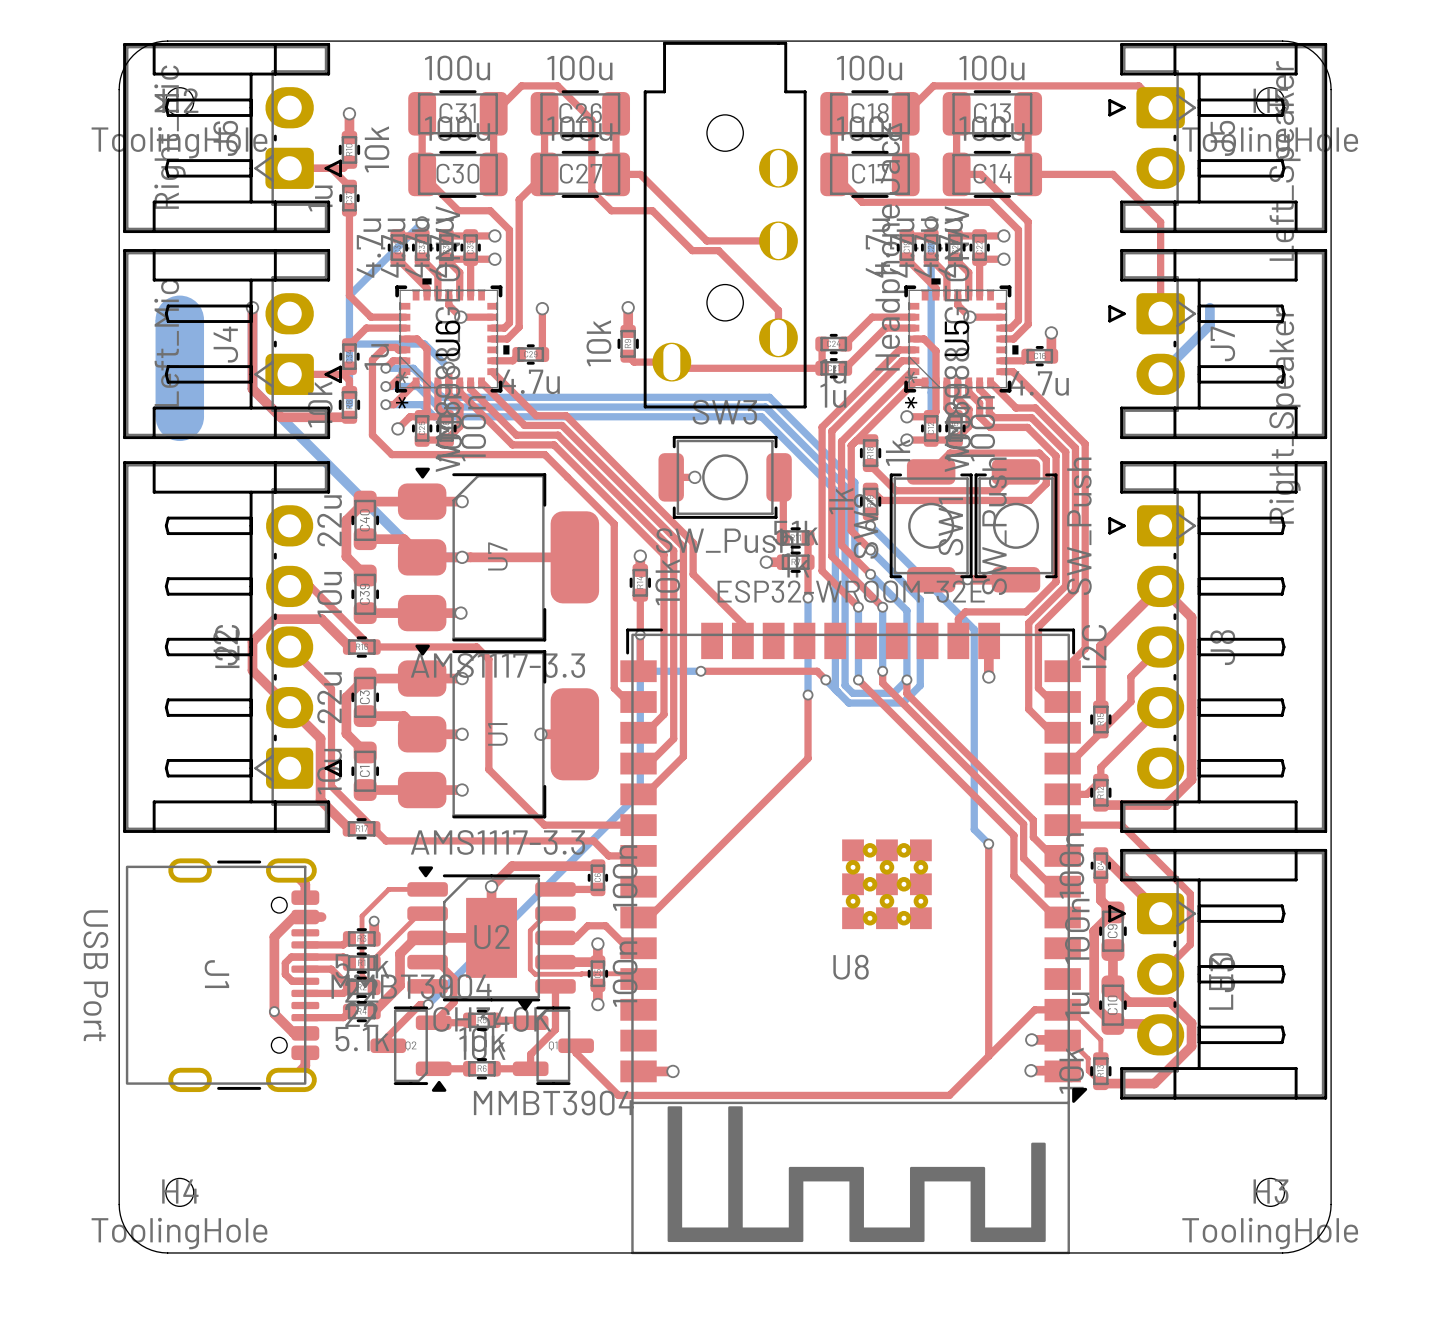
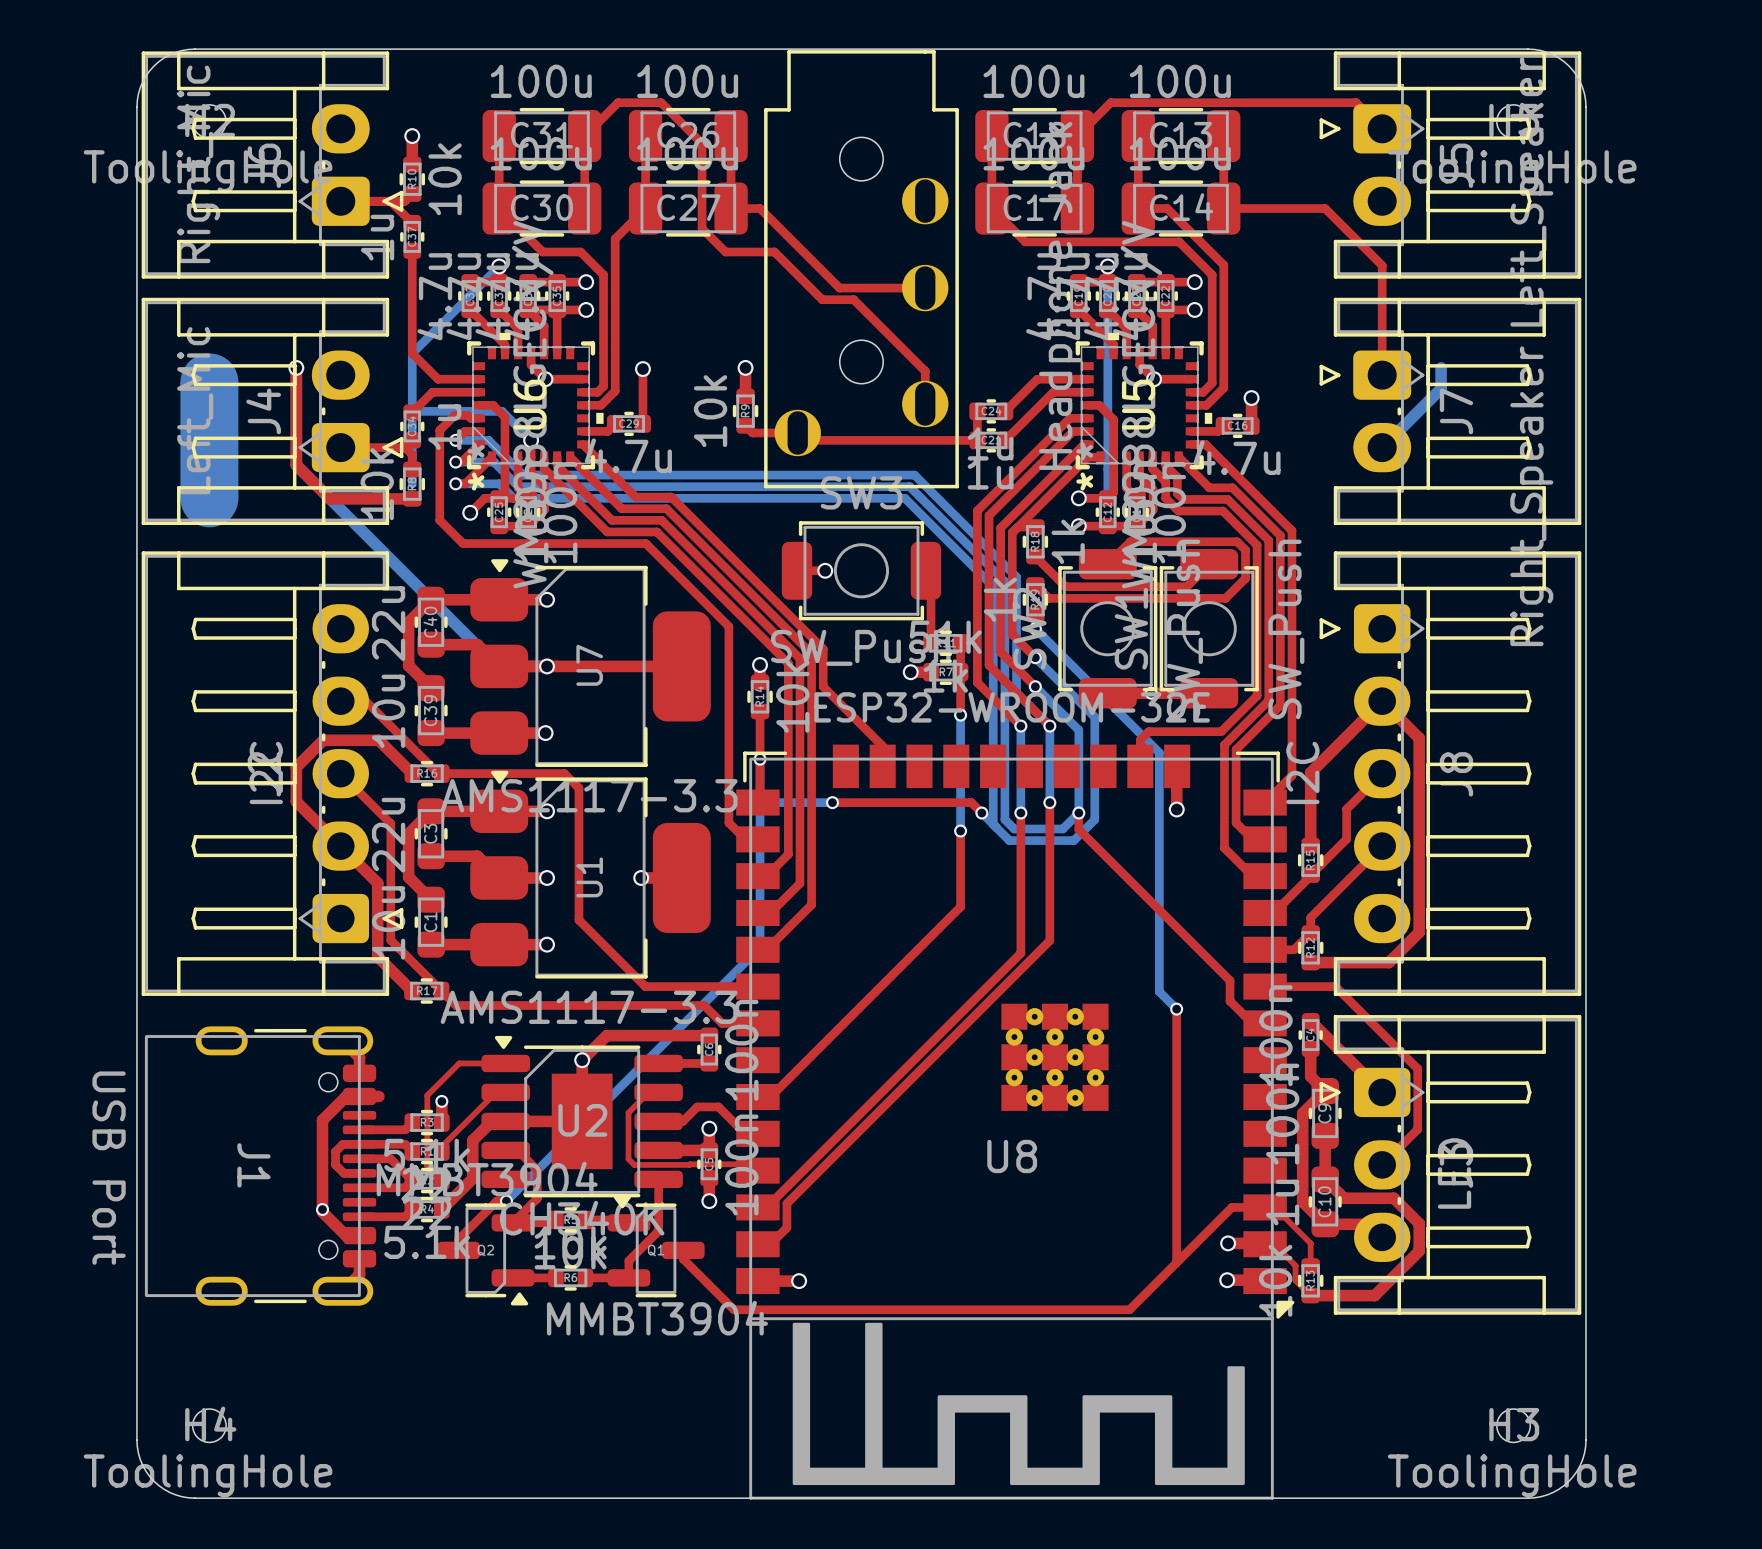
top track: (858, 679) (1013, 835) (1013, 875) (1055, 917) (1062, 917) -> (1020, 813) (1020, 953) (766, 1207) (757, 1207)
top track: (882, 683) (1023, 824) (1023, 858) (1052, 886) (1062, 886) -> (1049, 816) (1049, 940) (786, 1203) (786, 1227) (770, 1244) (757, 1244)

